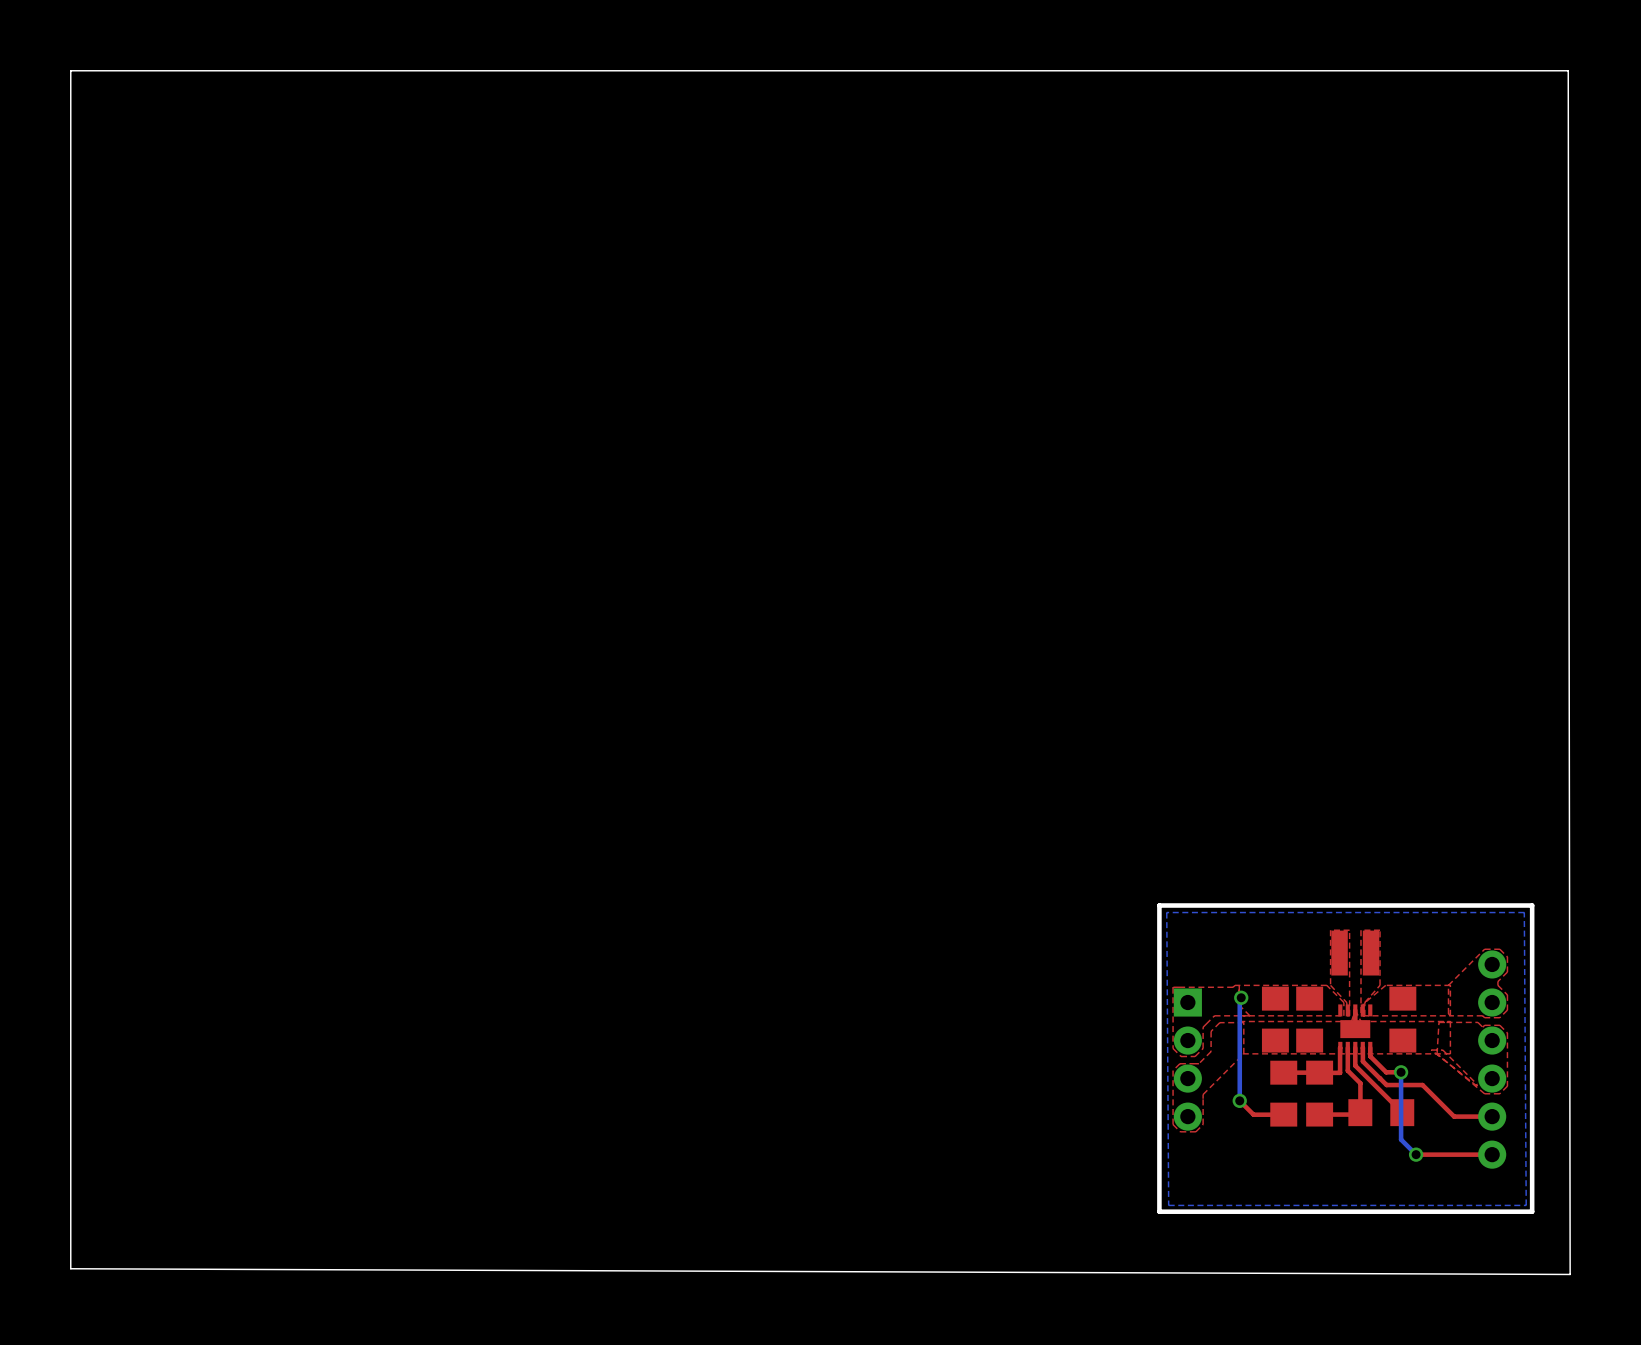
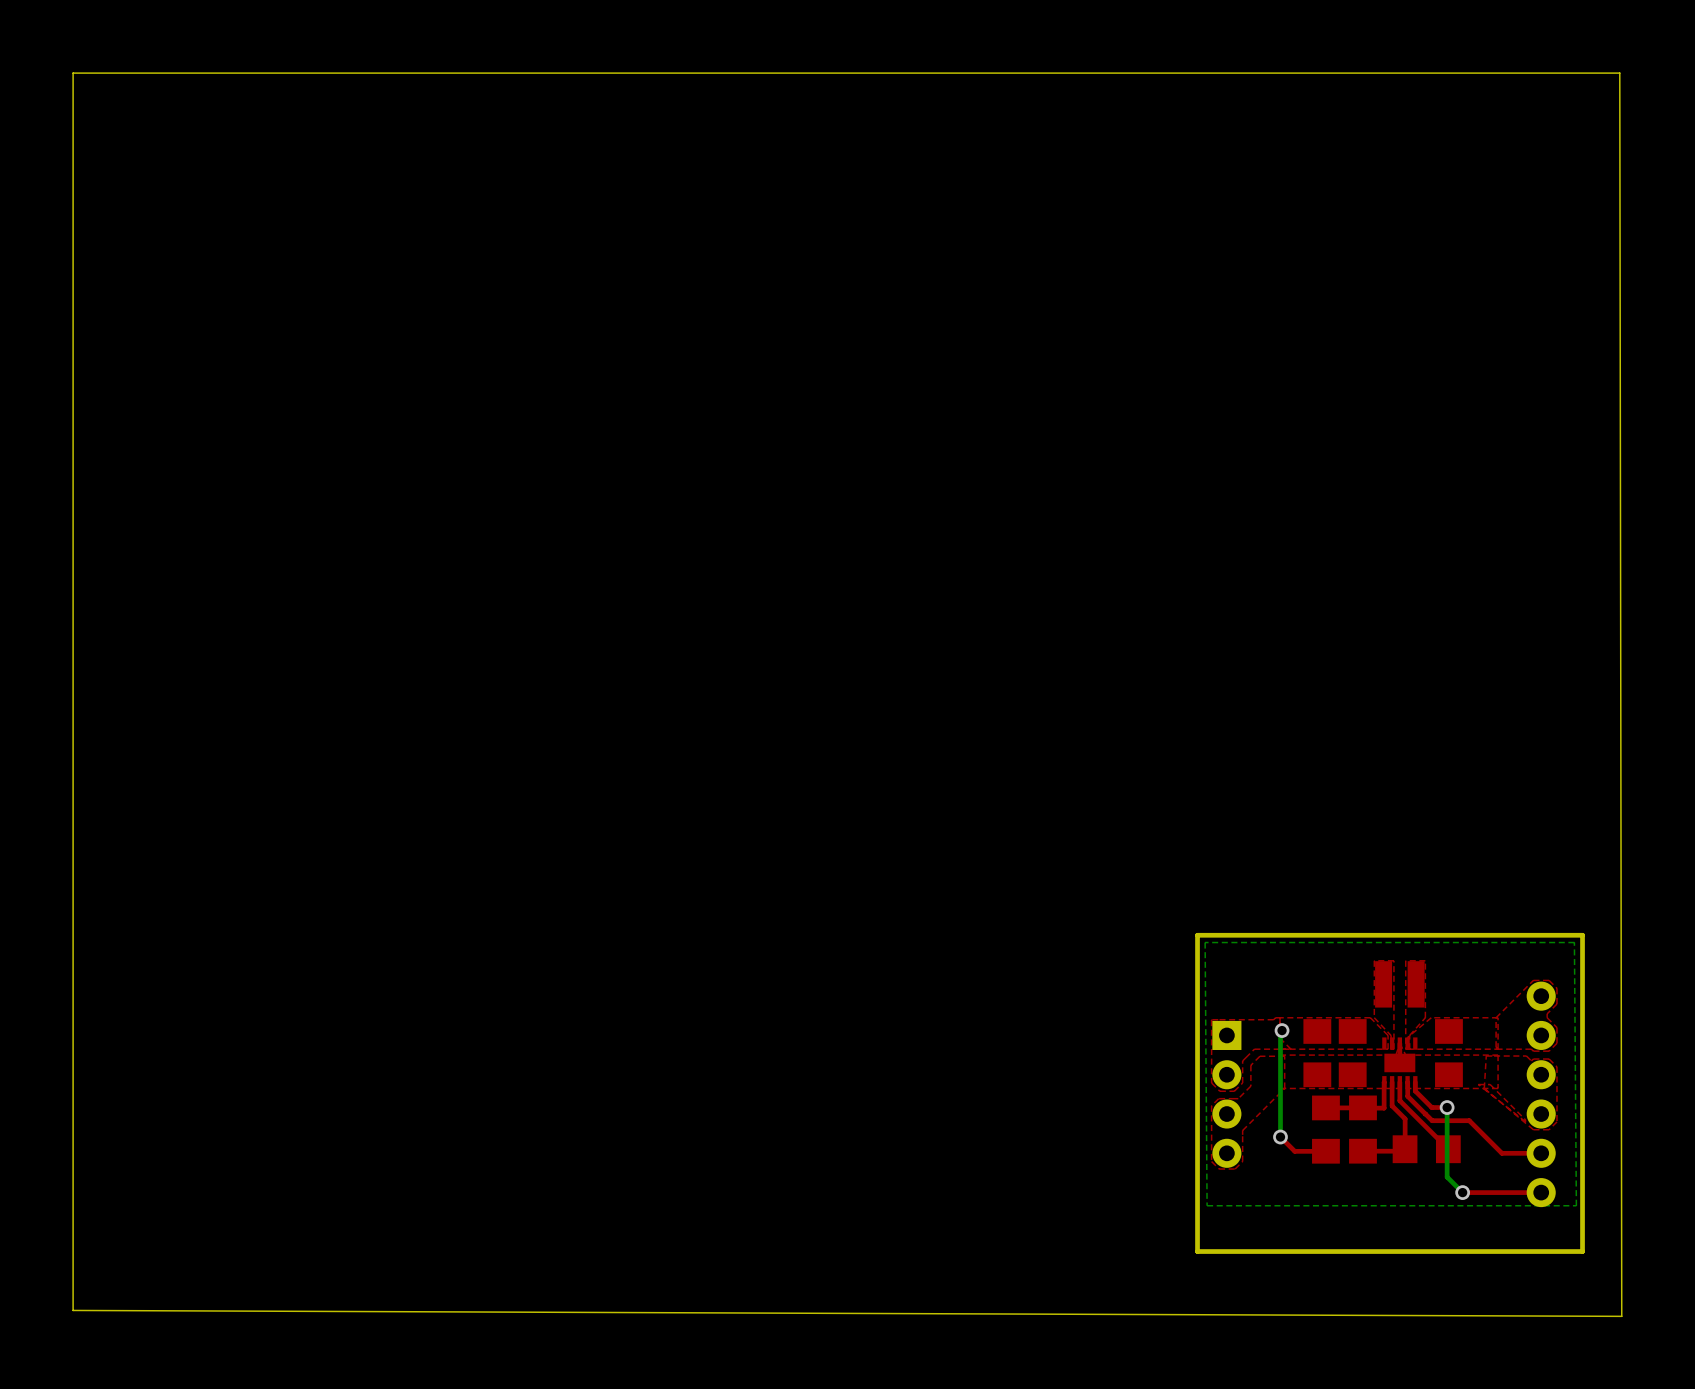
bottom zone outline: (1524, 912) (1526, 1205) (1168, 1205) (1166, 912) -> (1574, 942) (1576, 1205) (1207, 1205) (1205, 942)

